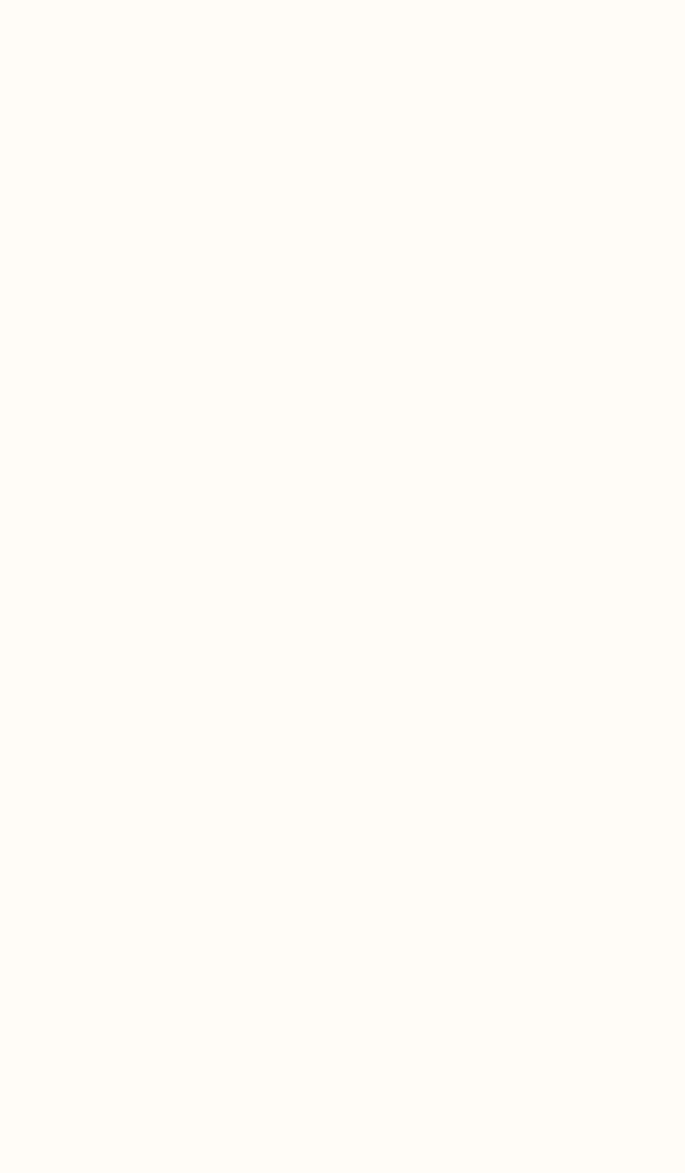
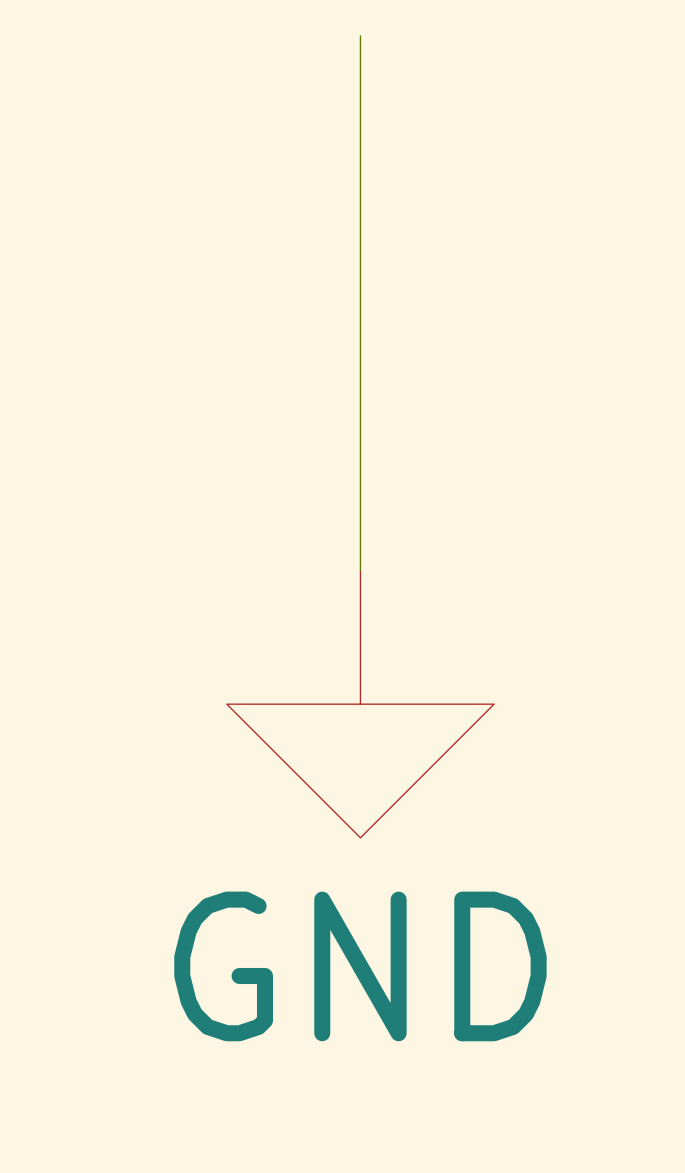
wire: none -> (360, 35) (360, 570)
power symbol: none -> GND (360, 704)

